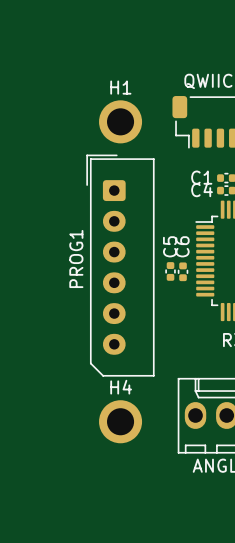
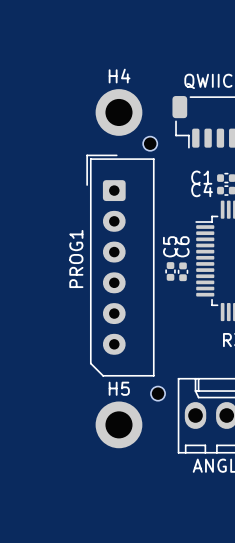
H1: (120, 121) -> none
part: none -> (150, 143)
part: none -> (158, 393)
H4 footprint: [99, 400, 143, 444] -> [95, 89, 143, 136]
H5: none -> (118, 424)

